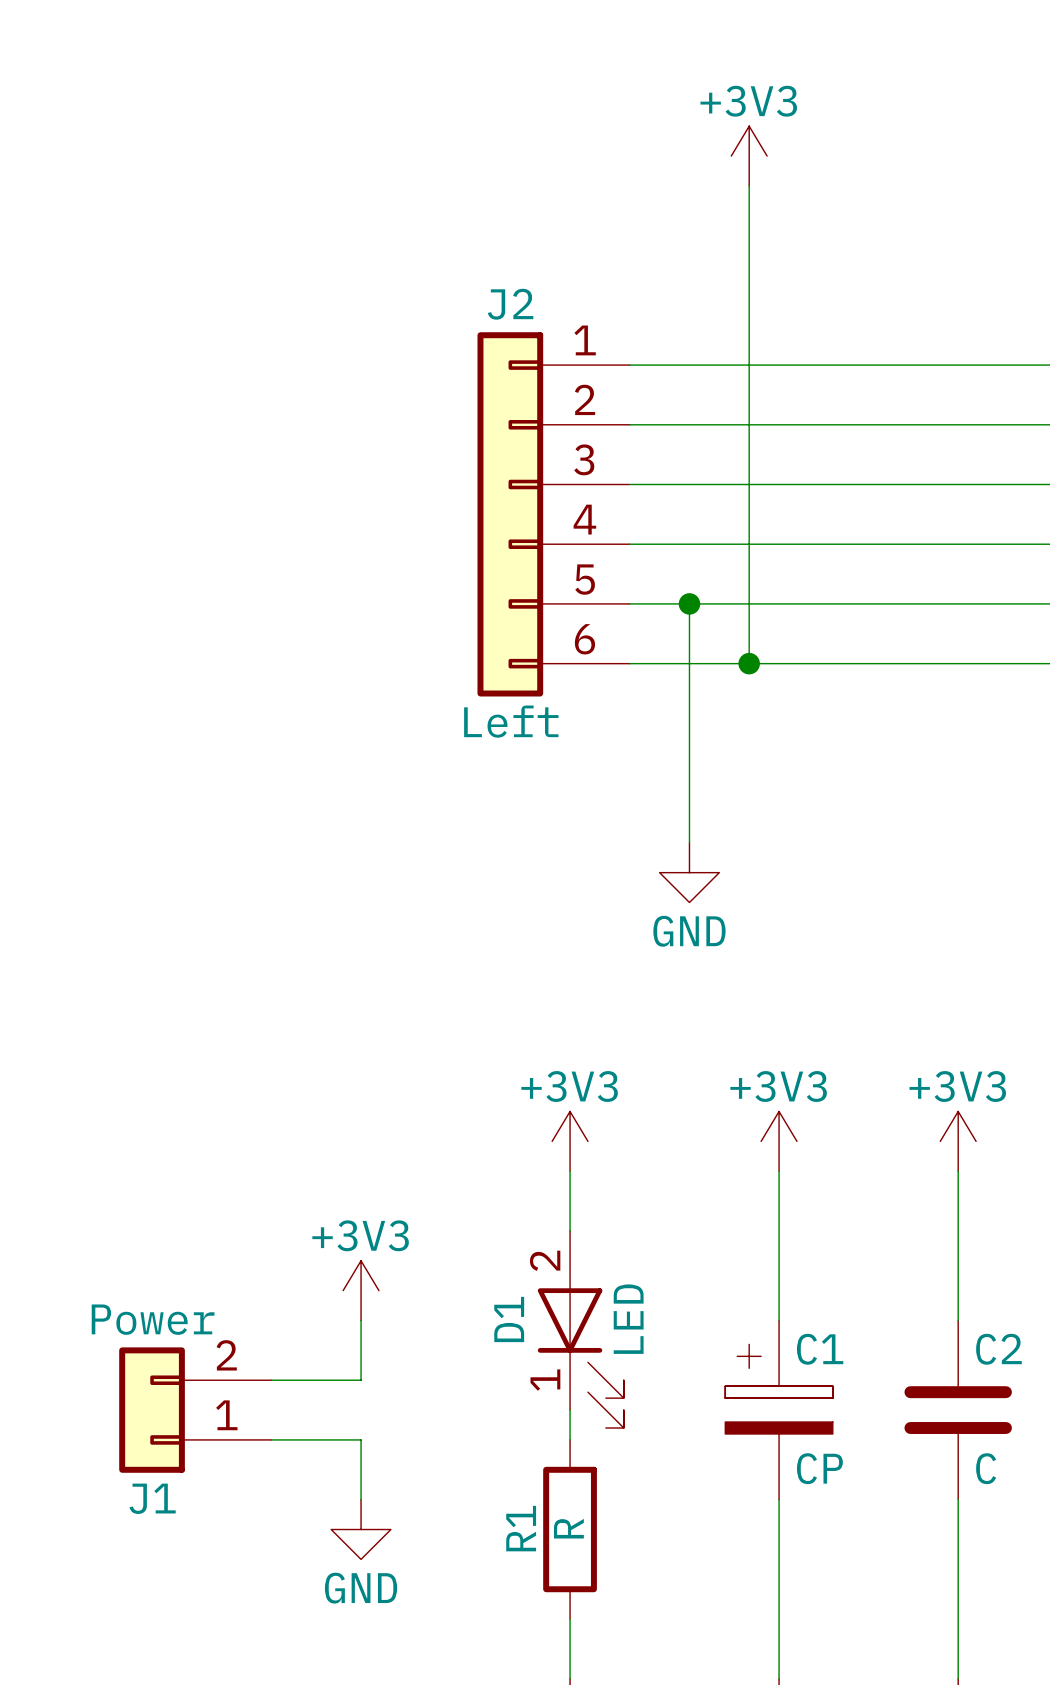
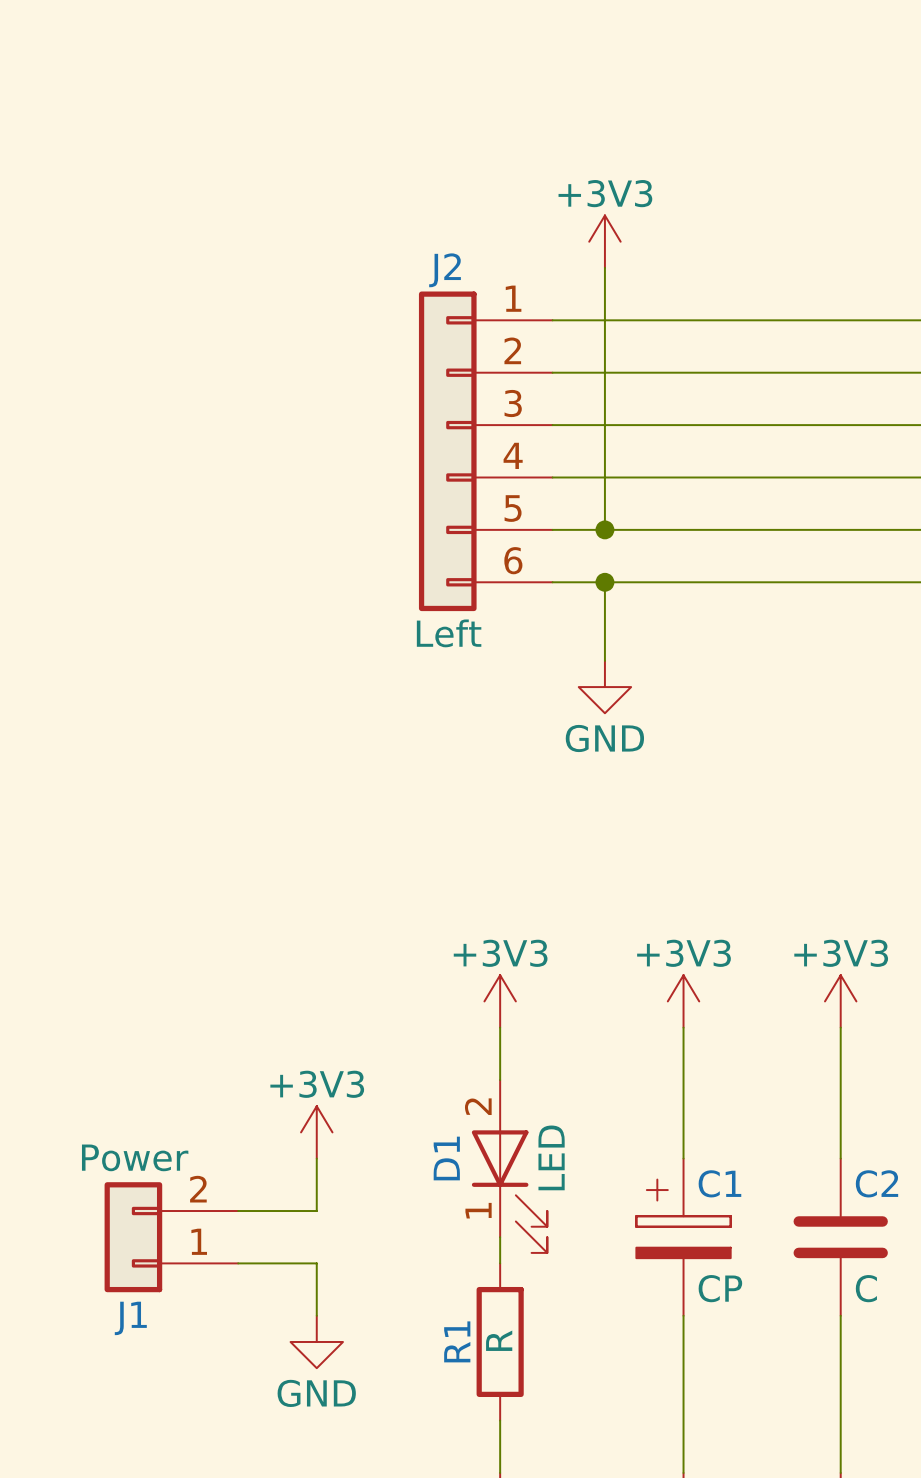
power symbol position: +3V3 (749, 156) -> +3V3 (604, 241)
wire: (749, 185) (749, 663) -> none
wire: (689, 603) (689, 663) -> (604, 529) (604, 267)
junction position: (749, 663) -> (604, 582)
wire: (689, 753) (689, 842) -> none
power symbol position: GND (689, 872) -> GND (604, 687)

